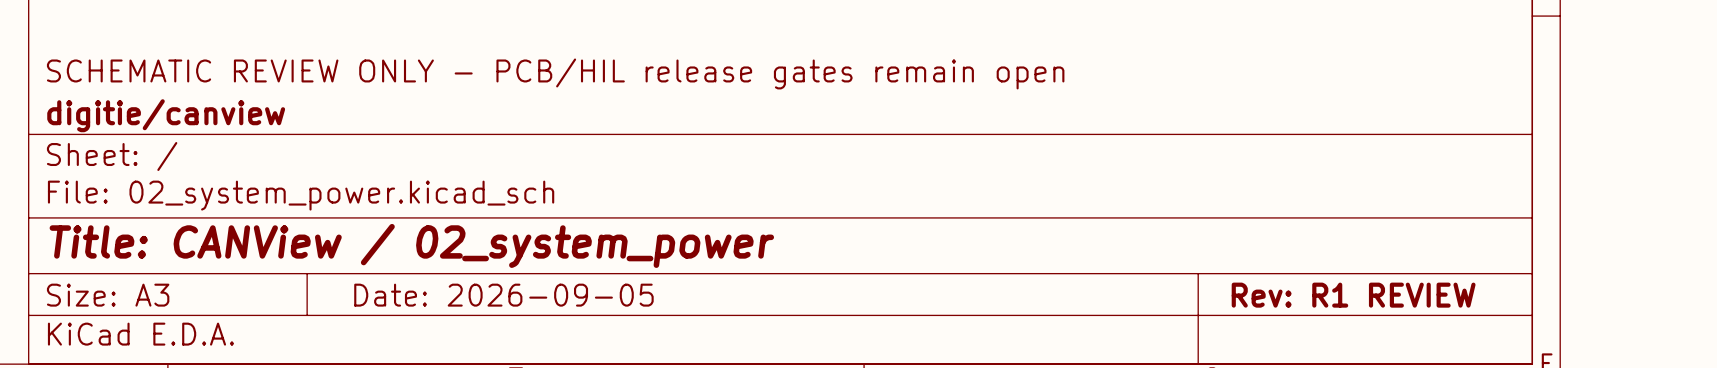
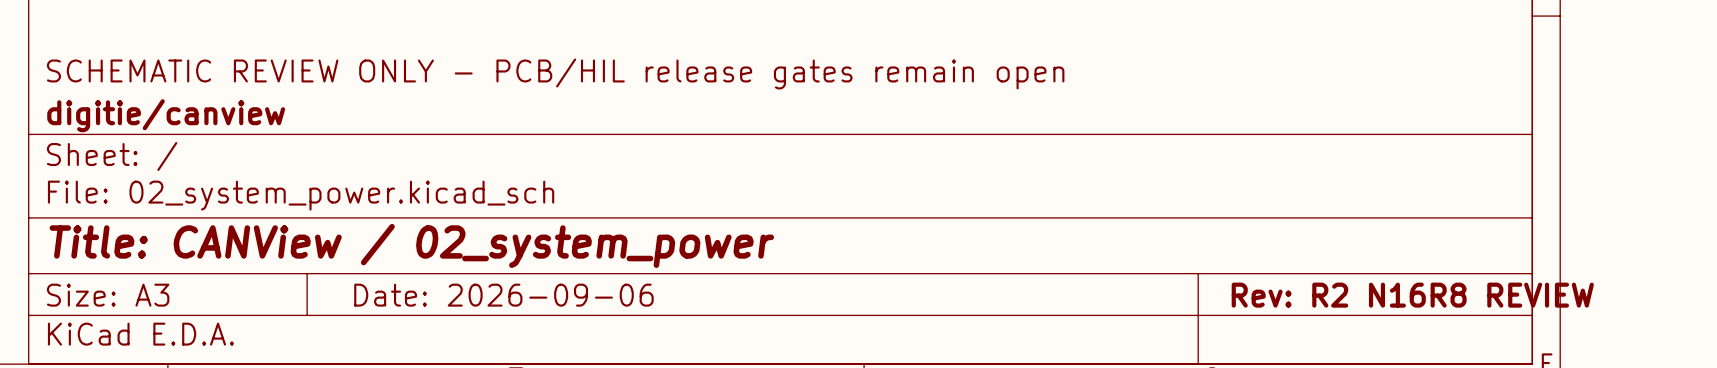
title block: Date: 2026-09-05 (503, 295) -> Date: 2026-09-06 (503, 295)
title block: Rev: R1 REVIEW (1353, 295) -> Rev: R2 N16R8 REVIEW (1412, 295)

